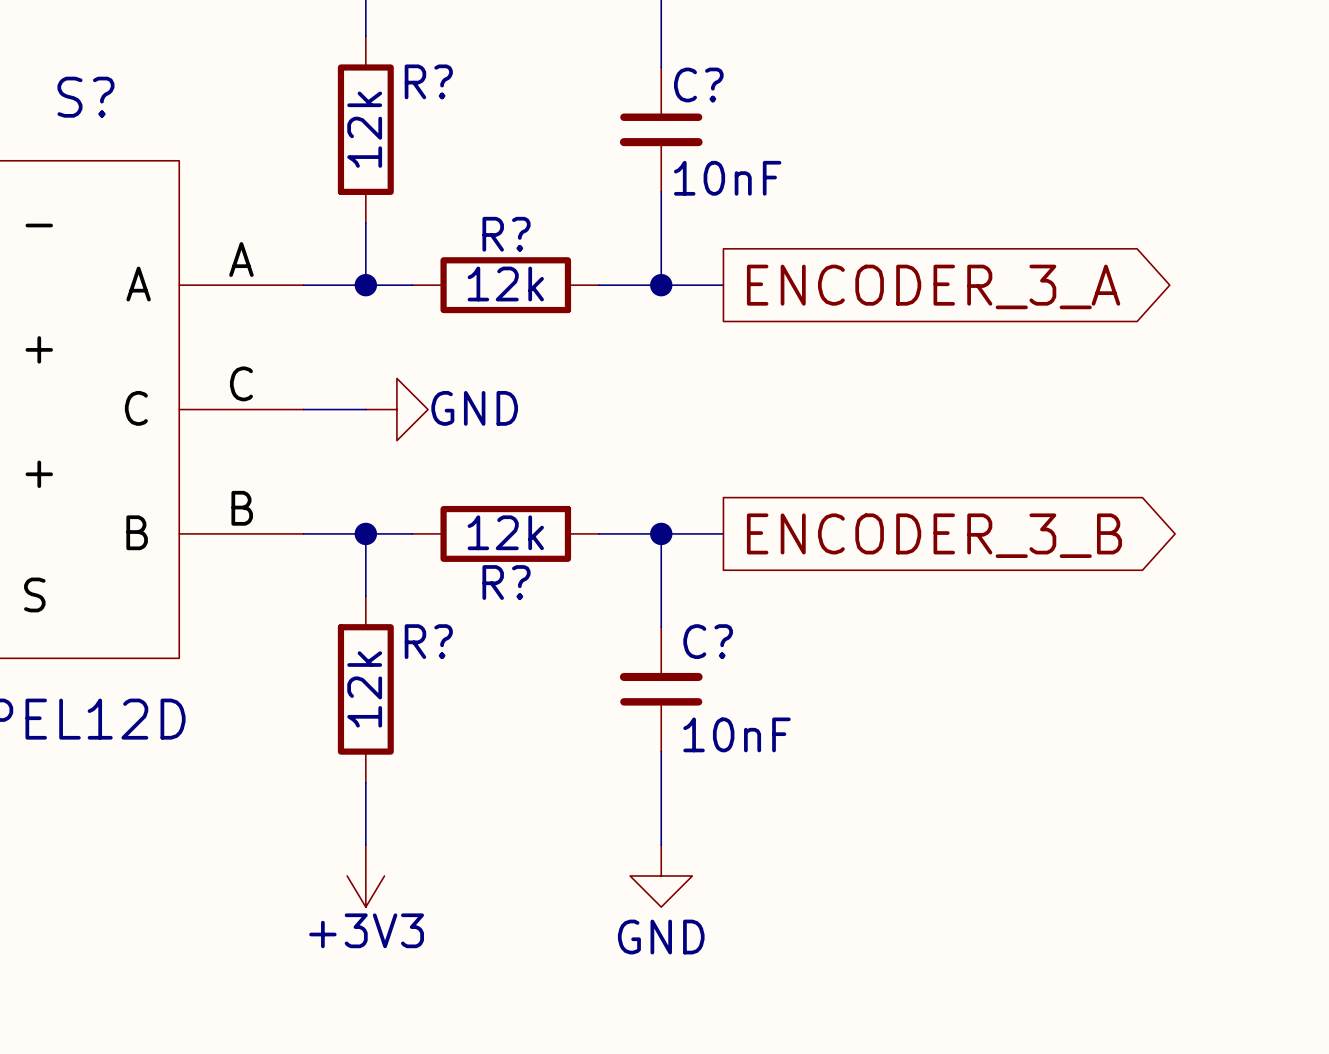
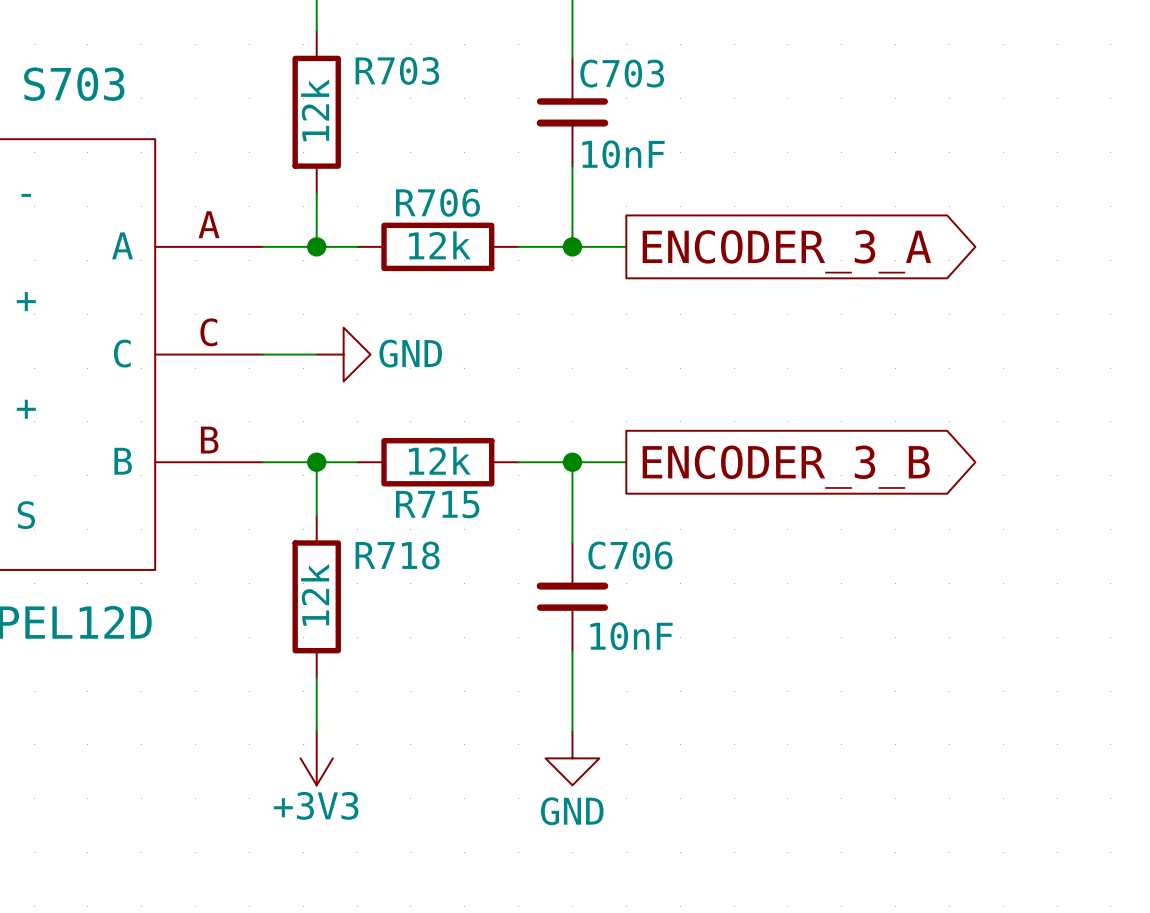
R? name: R? (428, 81) -> R703 (397, 70)
C? name: C? (698, 84) -> C703 (622, 73)
S? name: S? (85, 97) -> S703 (74, 84)
R? name: R? (506, 234) -> R706 (437, 202)
R? name: R? (506, 582) -> R715 (437, 504)
R? name: R? (428, 641) -> R718 (397, 555)
C? name: C? (708, 641) -> C706 (630, 555)

